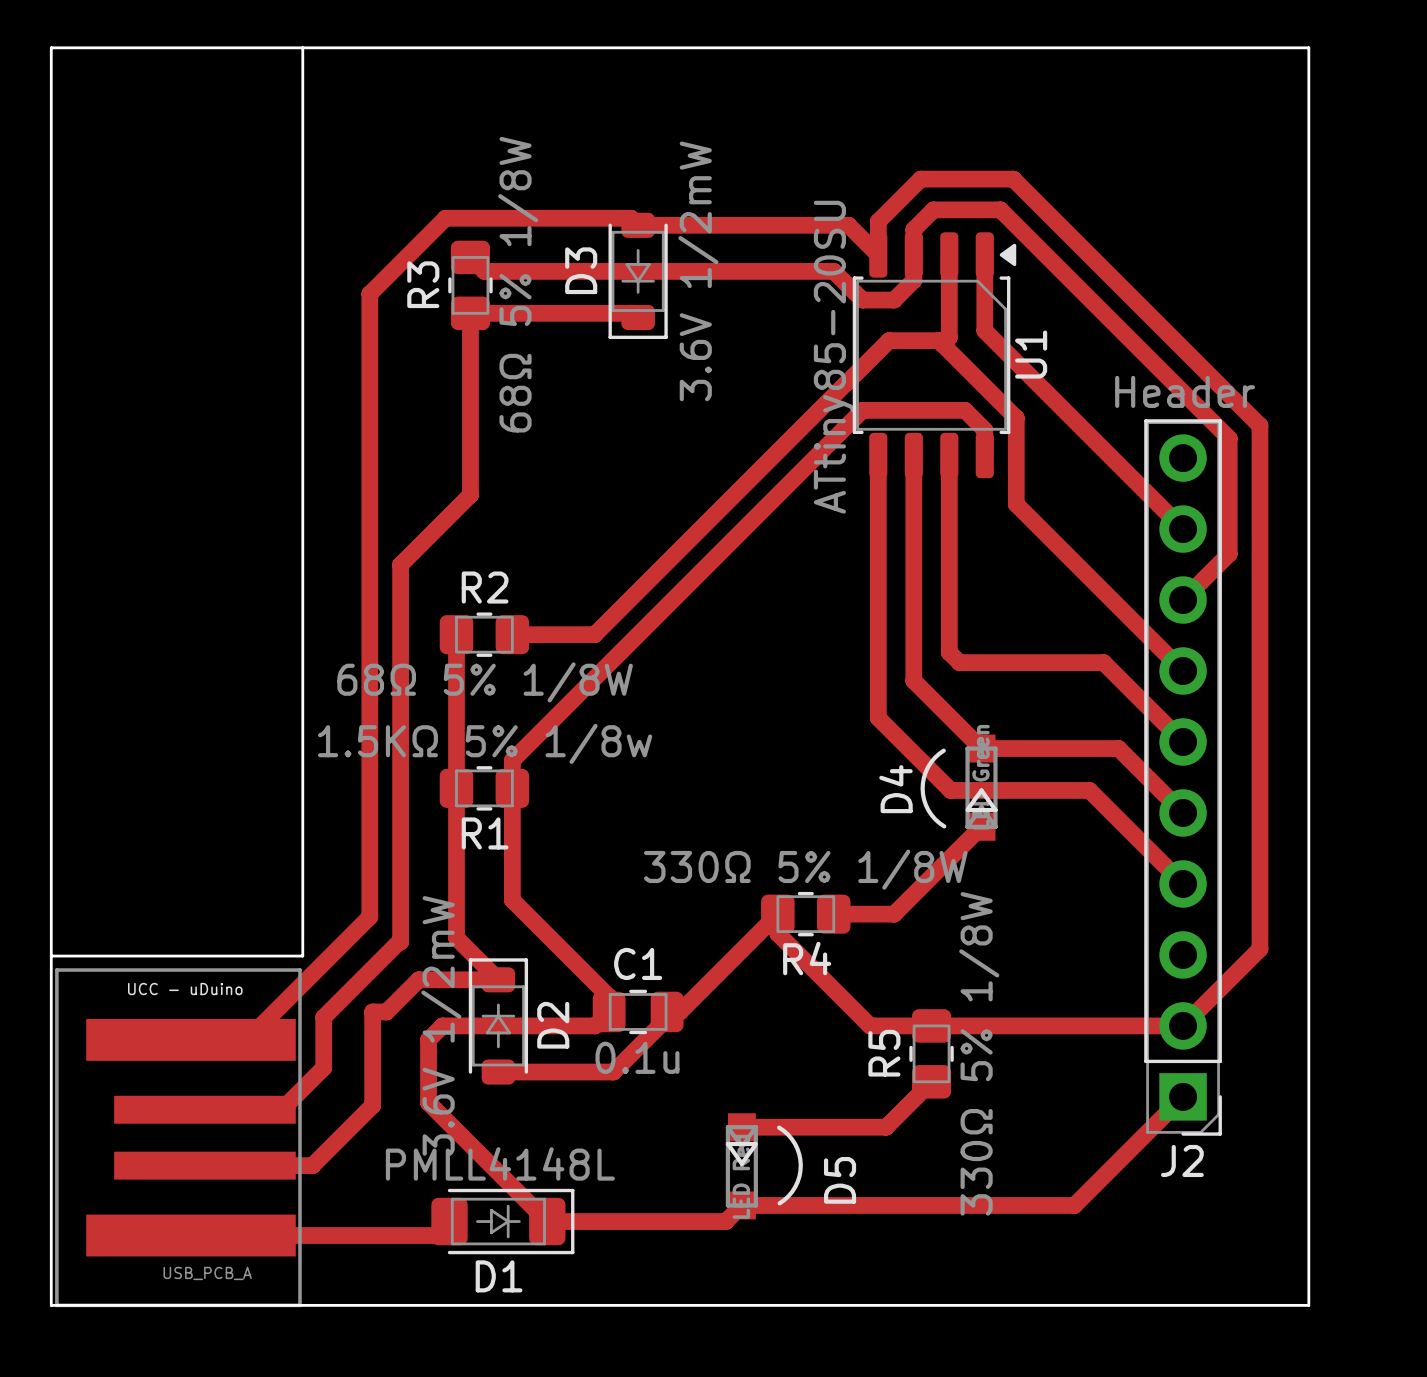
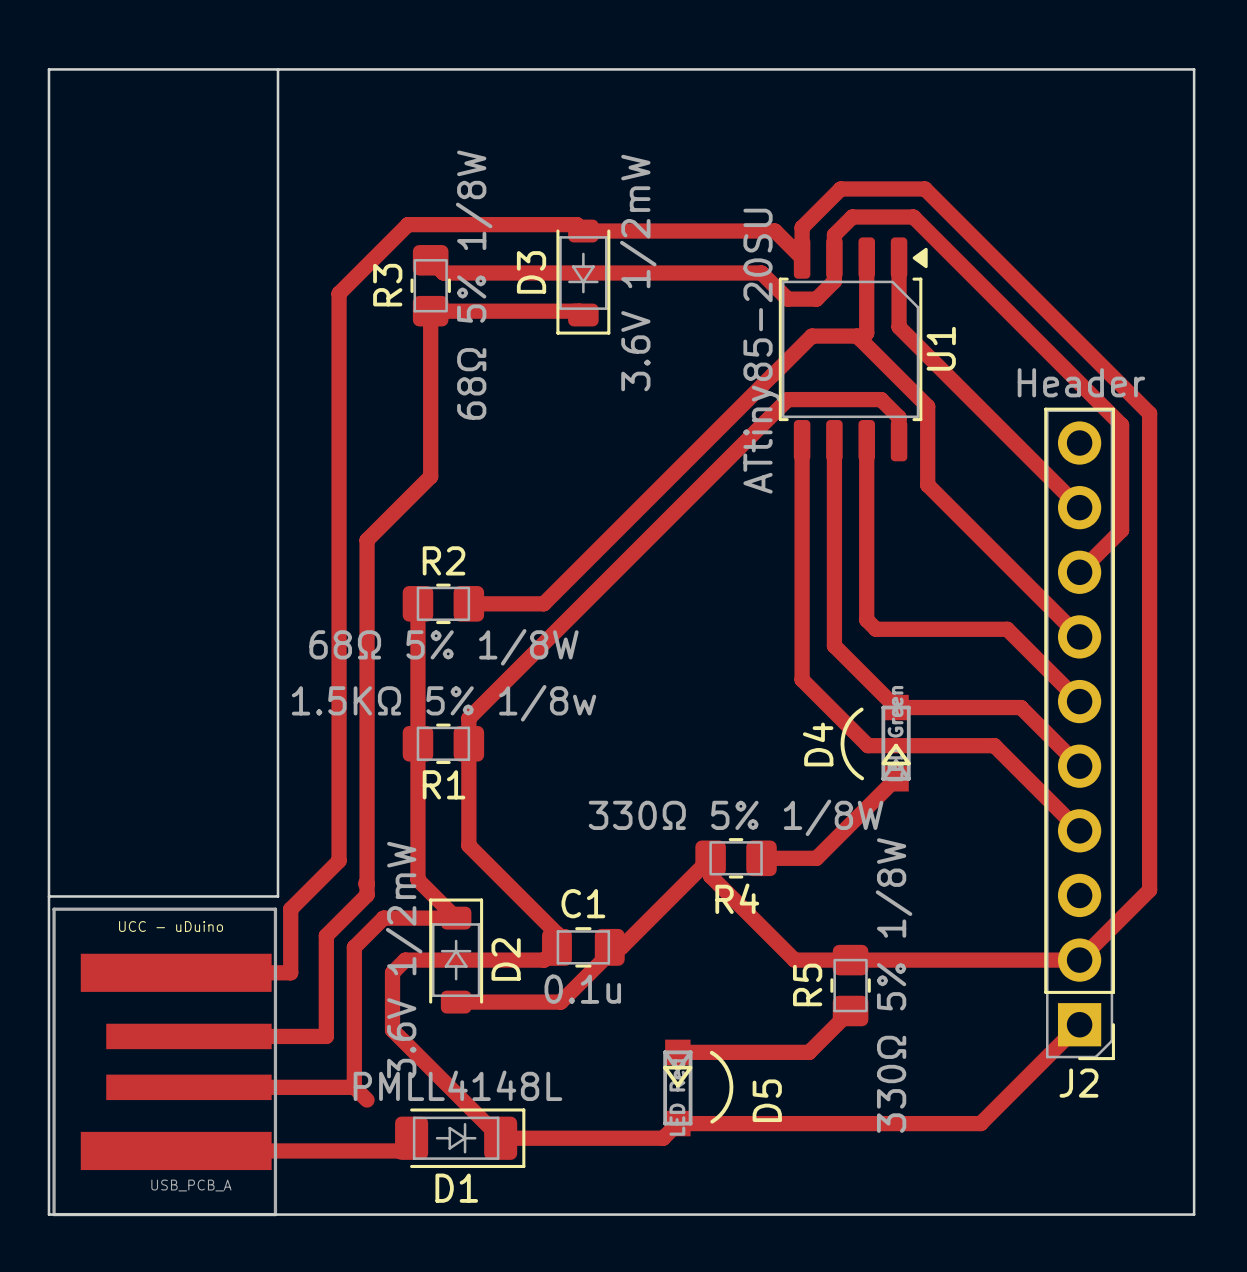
track: (399, 942) (323, 1017) (323, 1067) (281, 1109) -> (367, 883) (367, 895) (326, 935) (326, 1036) (258, 1036)
track: (316, 970) (246, 1039) -> (290, 909) (290, 972) (227, 972)
track: (386, 1011) (372, 1011) (372, 1105) (312, 1165) -> (354, 947) (354, 1087)
track: none -> (286, 1087) (354, 1087)
track: none -> (354, 1087) (367, 1100)

